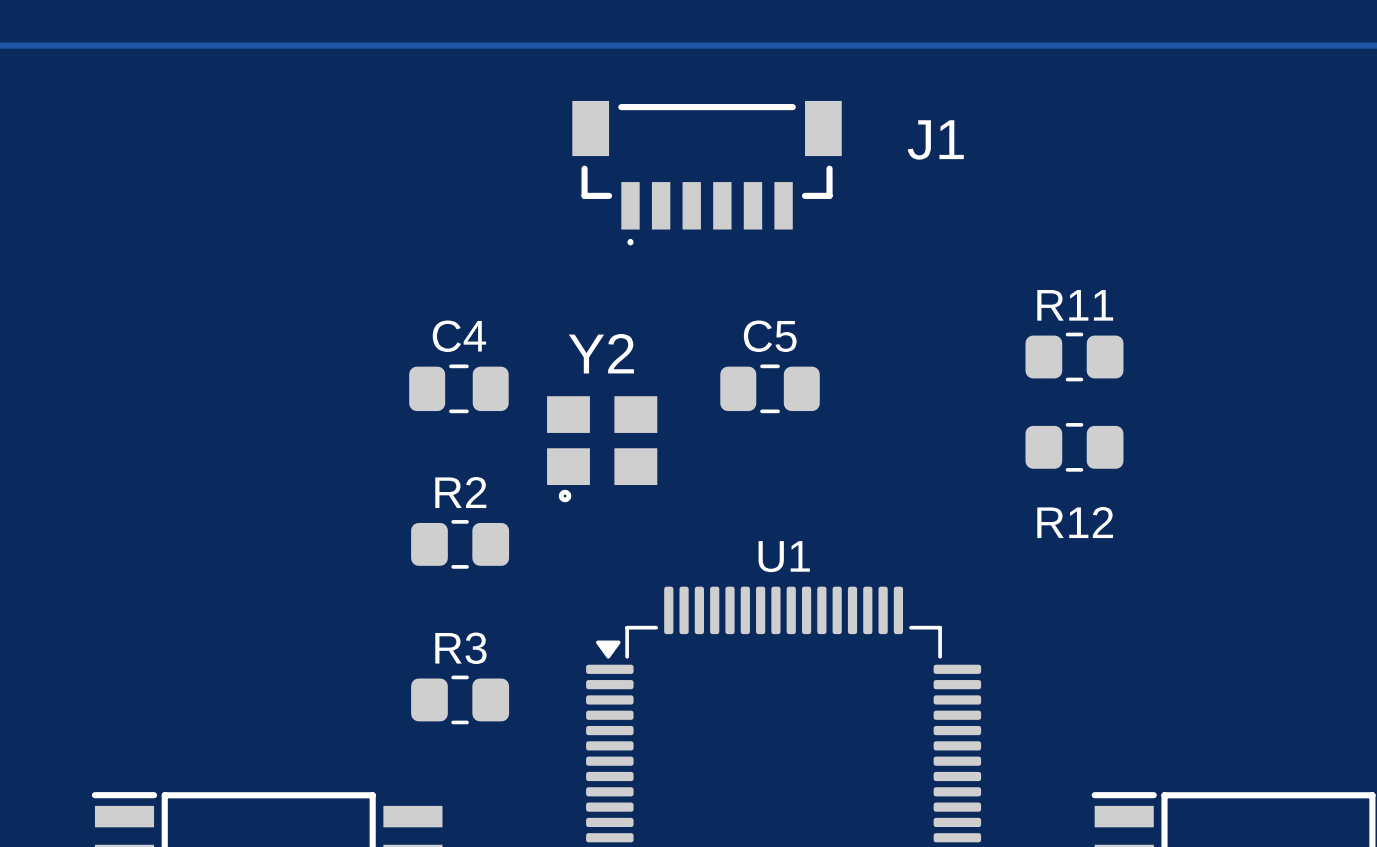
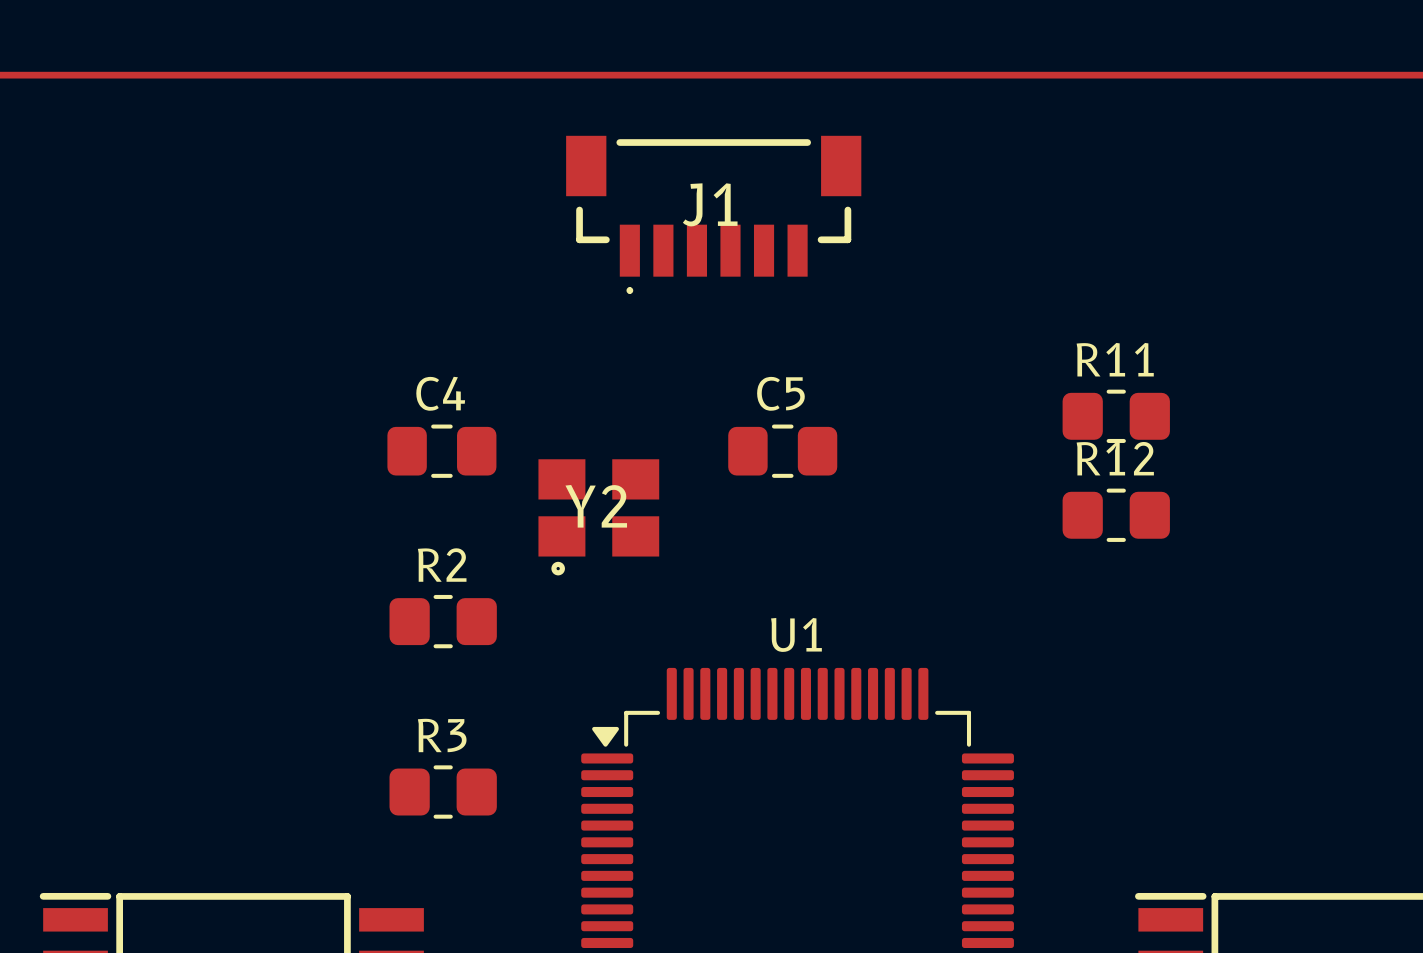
J1 name position: J1 (935, 139) -> J1 (710, 204)
Y2 name position: Y2 (601, 353) -> Y2 (596, 506)
R12 name position: R12 (1075, 522) -> R12 (1115, 458)

